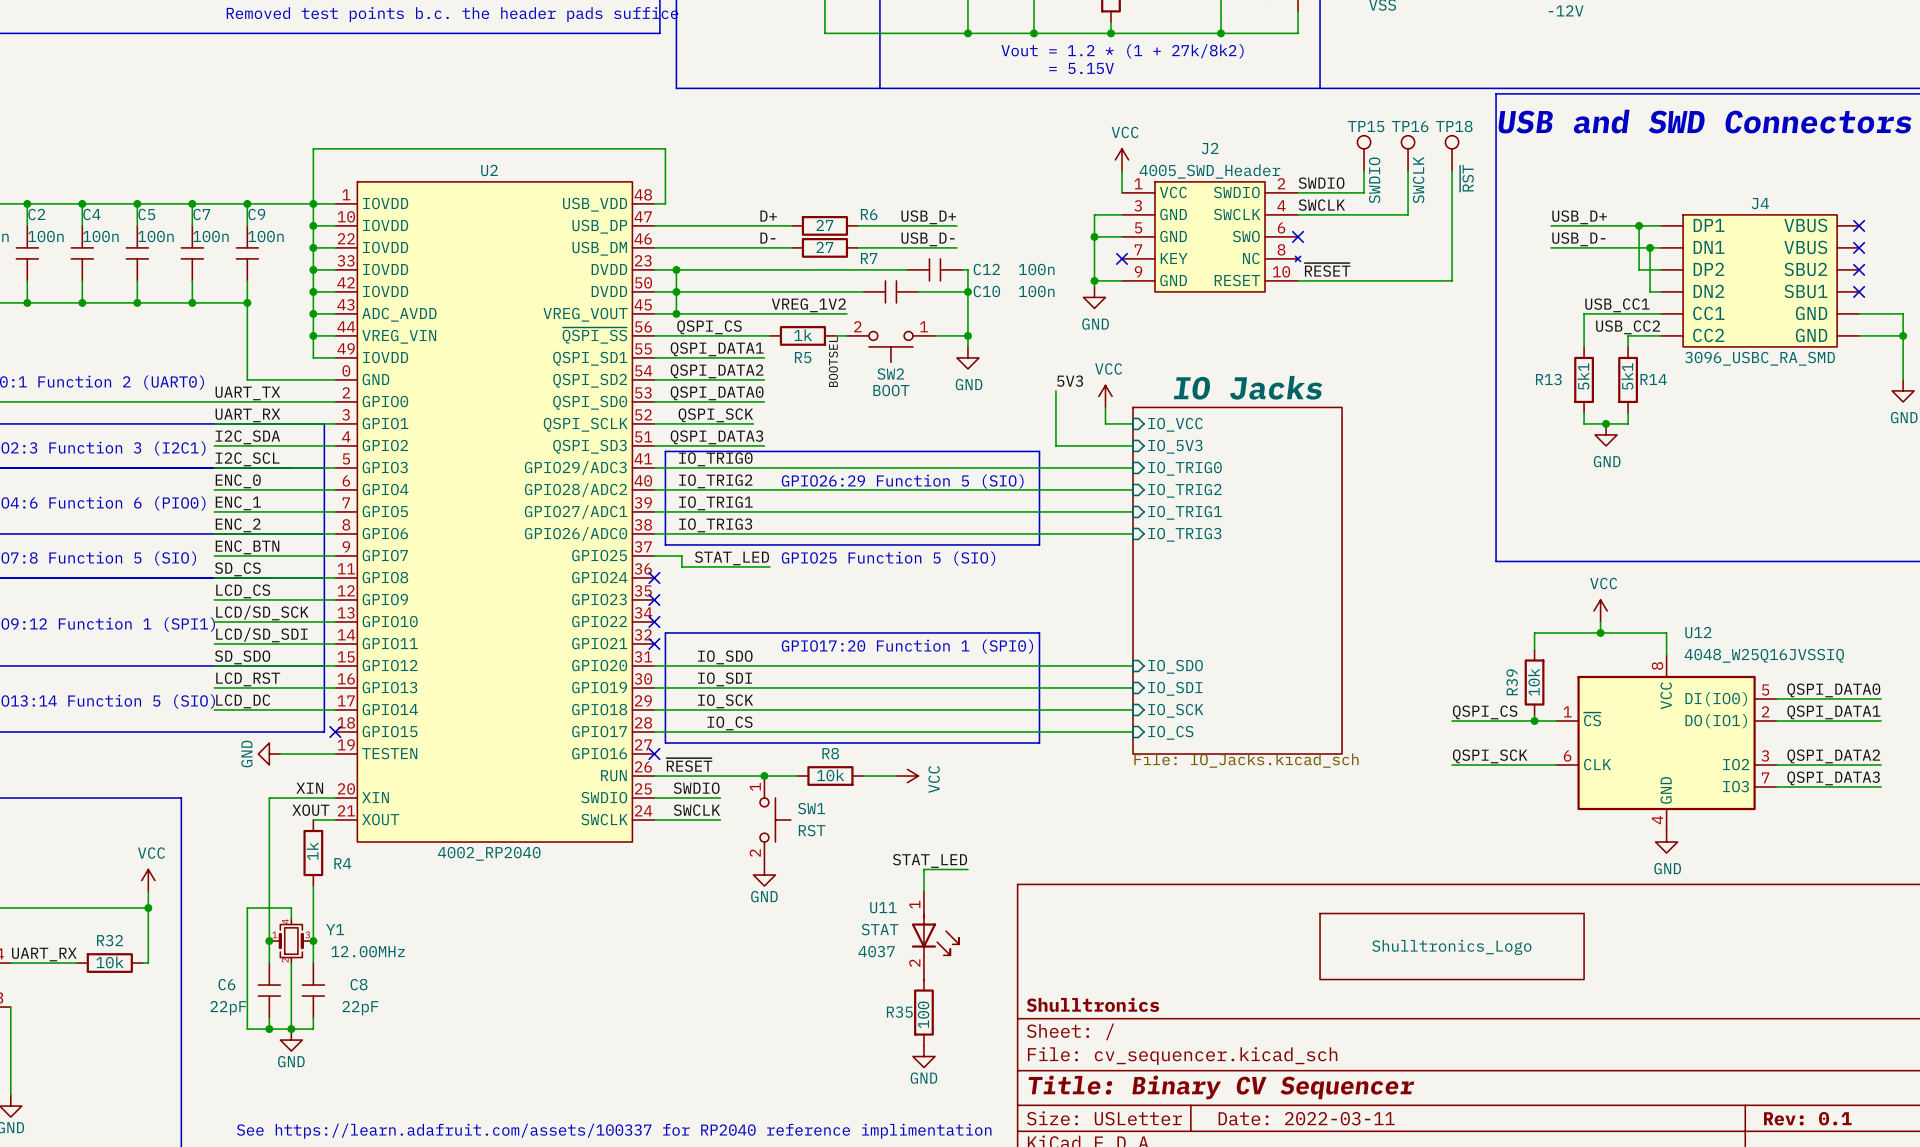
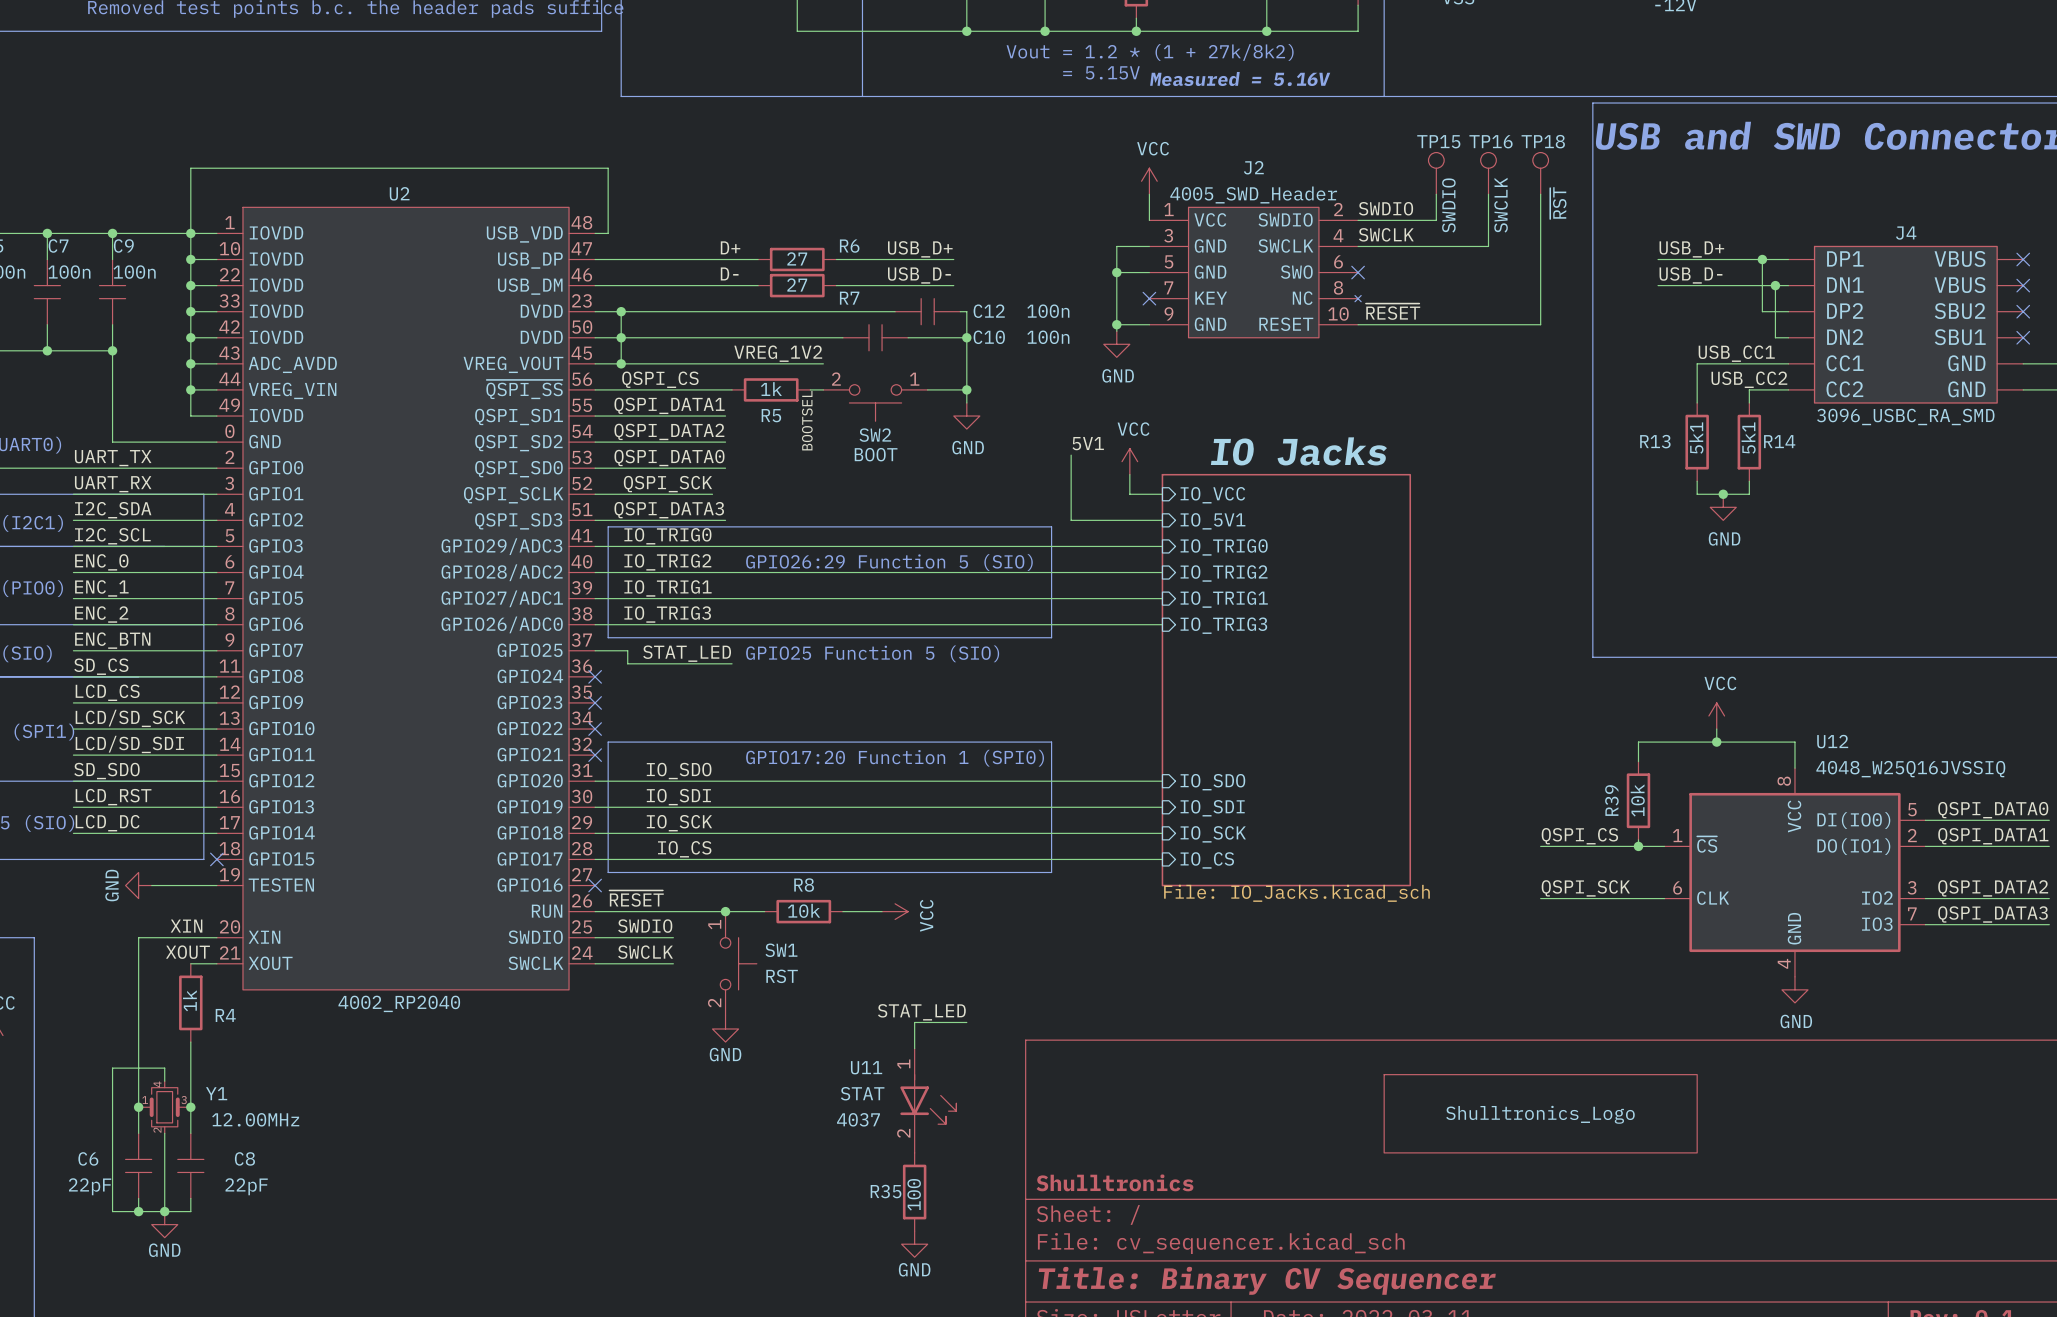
text: none -> Measured = 5.16V (1240, 79)
label: 5V3 (1070, 381) -> 5V1 (1088, 443)
sheet pin: IO_5V3 (1175, 446) -> IO_5V1 (1212, 521)

